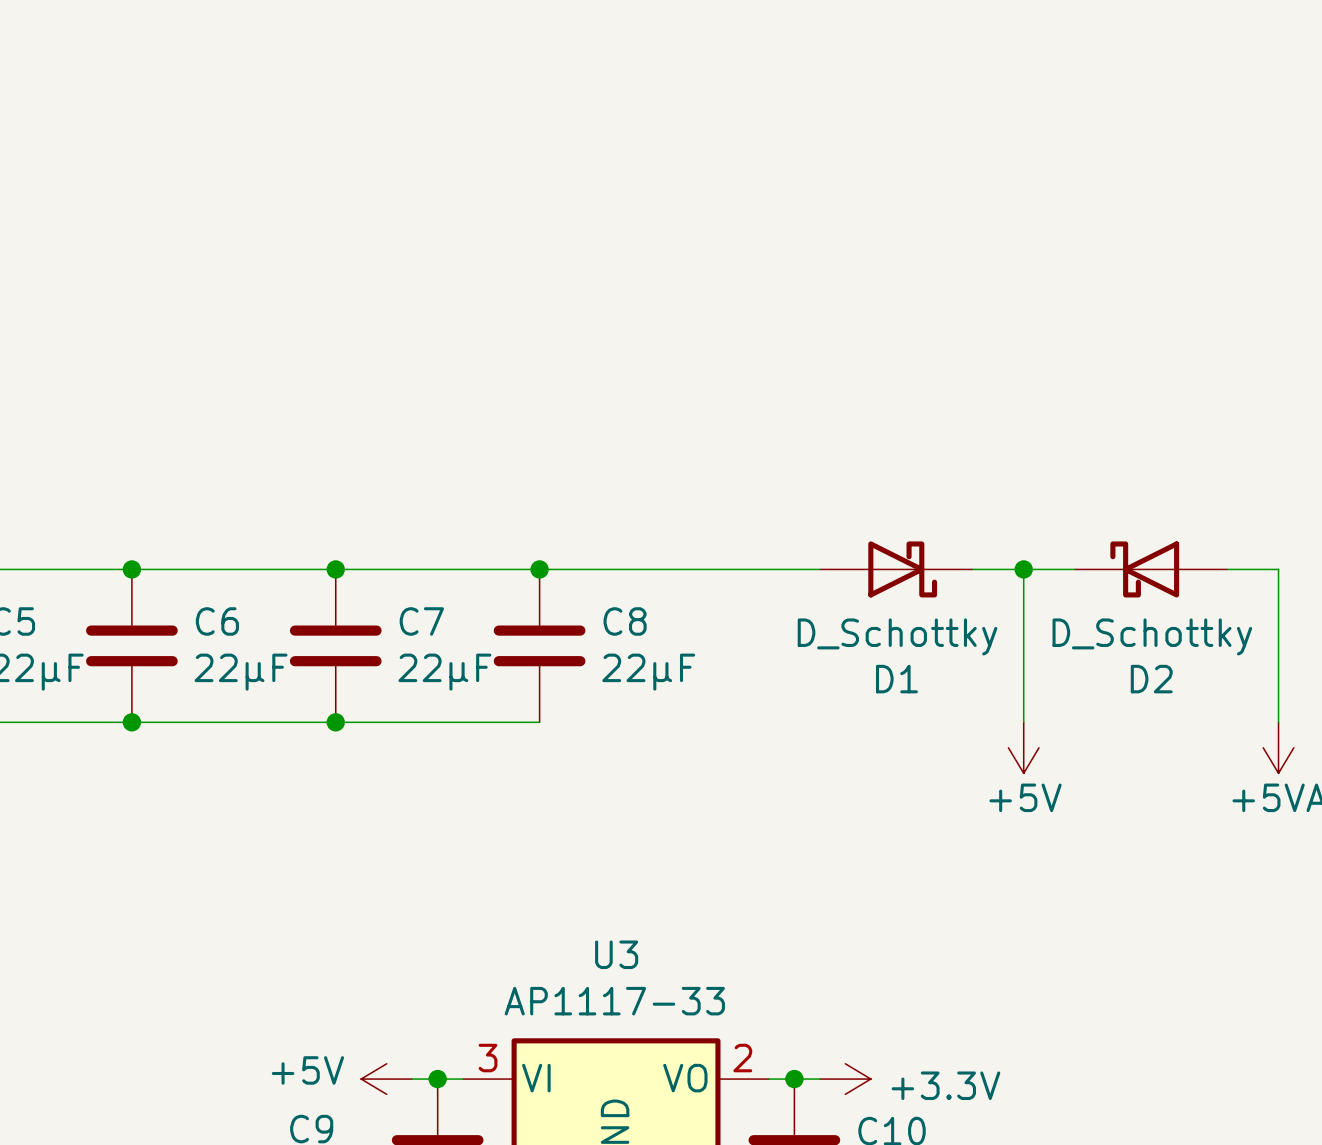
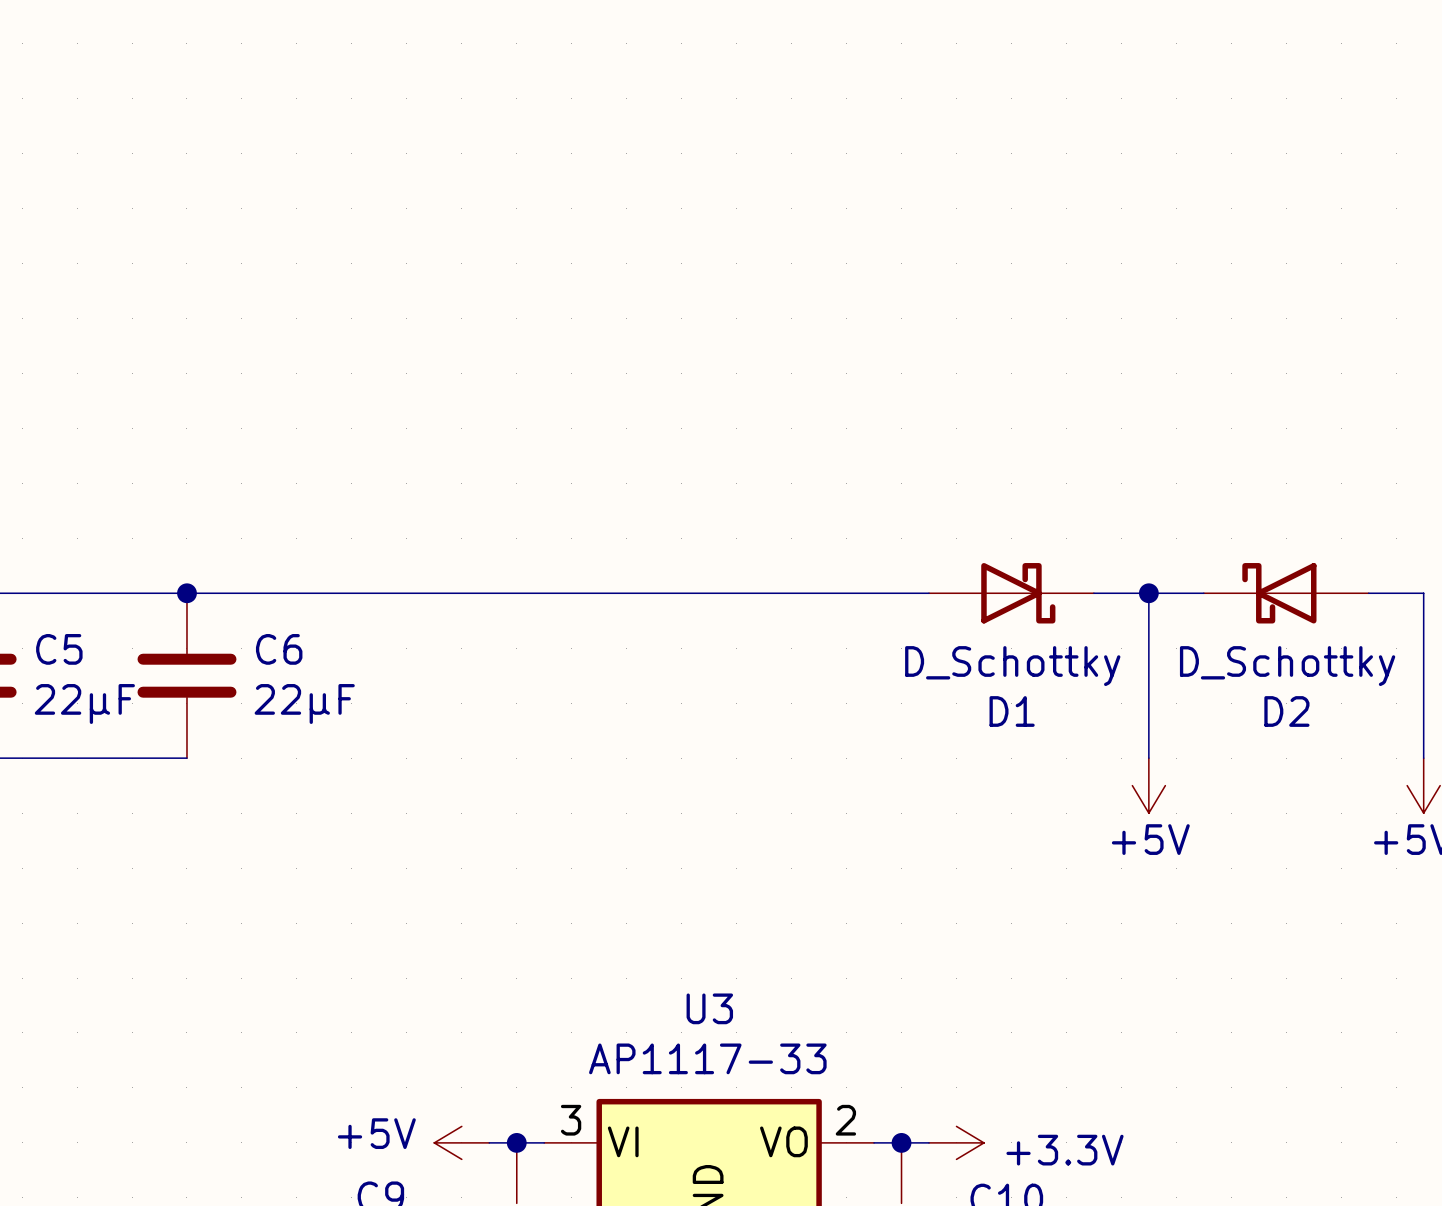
junction: (335, 569) -> none
junction: (539, 569) -> none
C7: 22µF (335, 645) -> none
C8: 22µF (539, 645) -> none
wire: (131, 722) (539, 722) -> none
junction: (131, 722) -> none
junction: (335, 722) -> none

